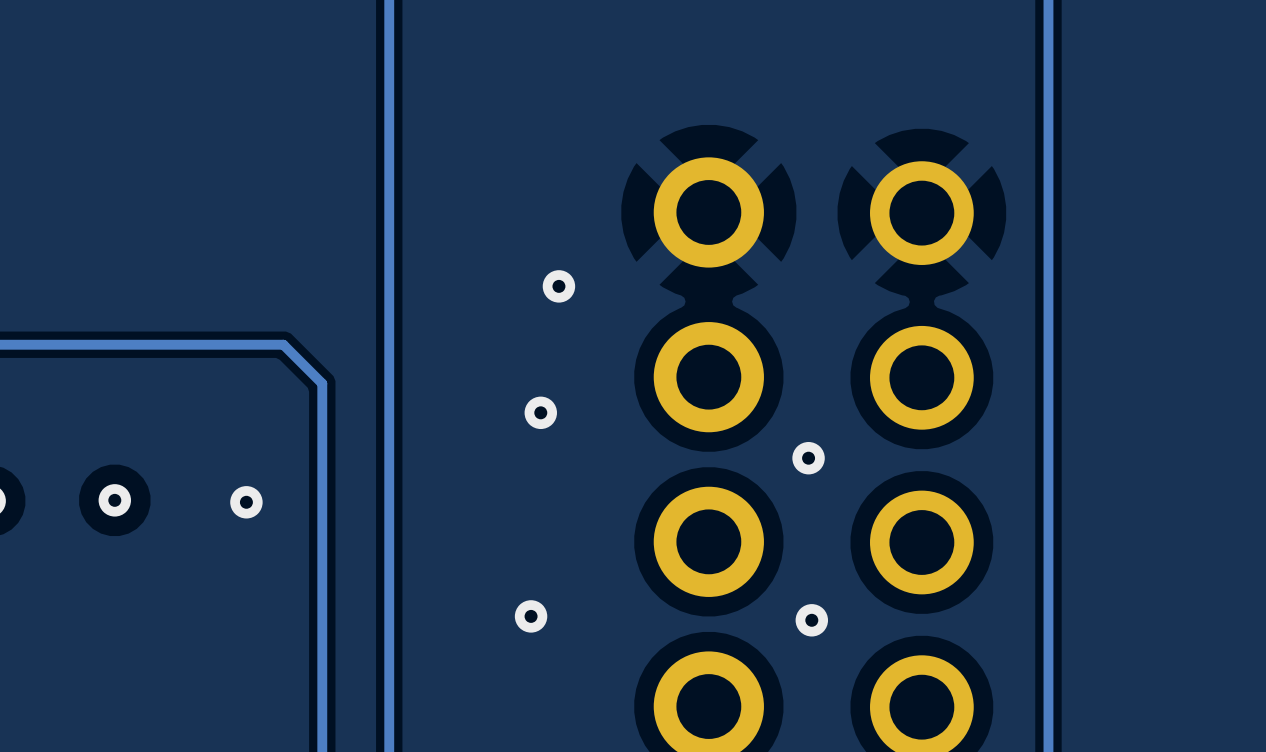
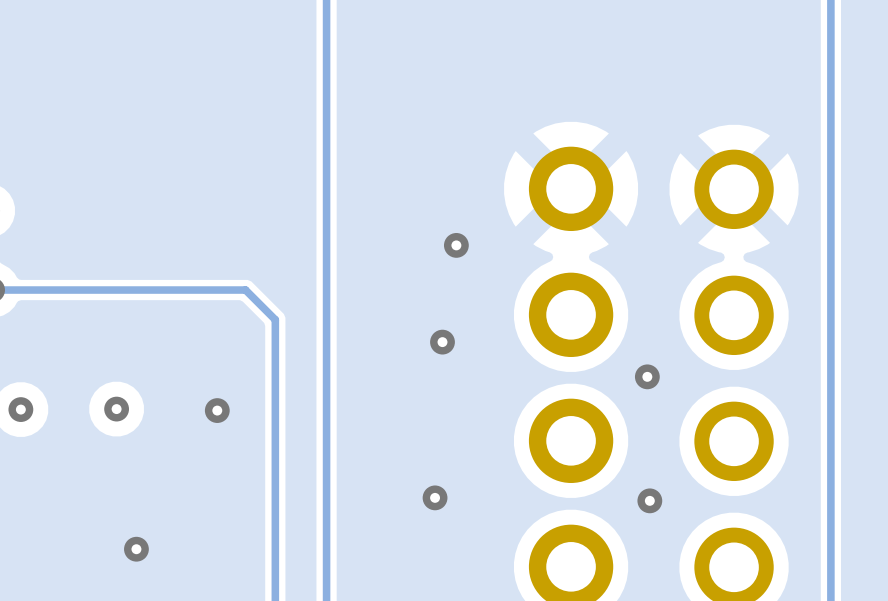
via: none -> (136, 549)

